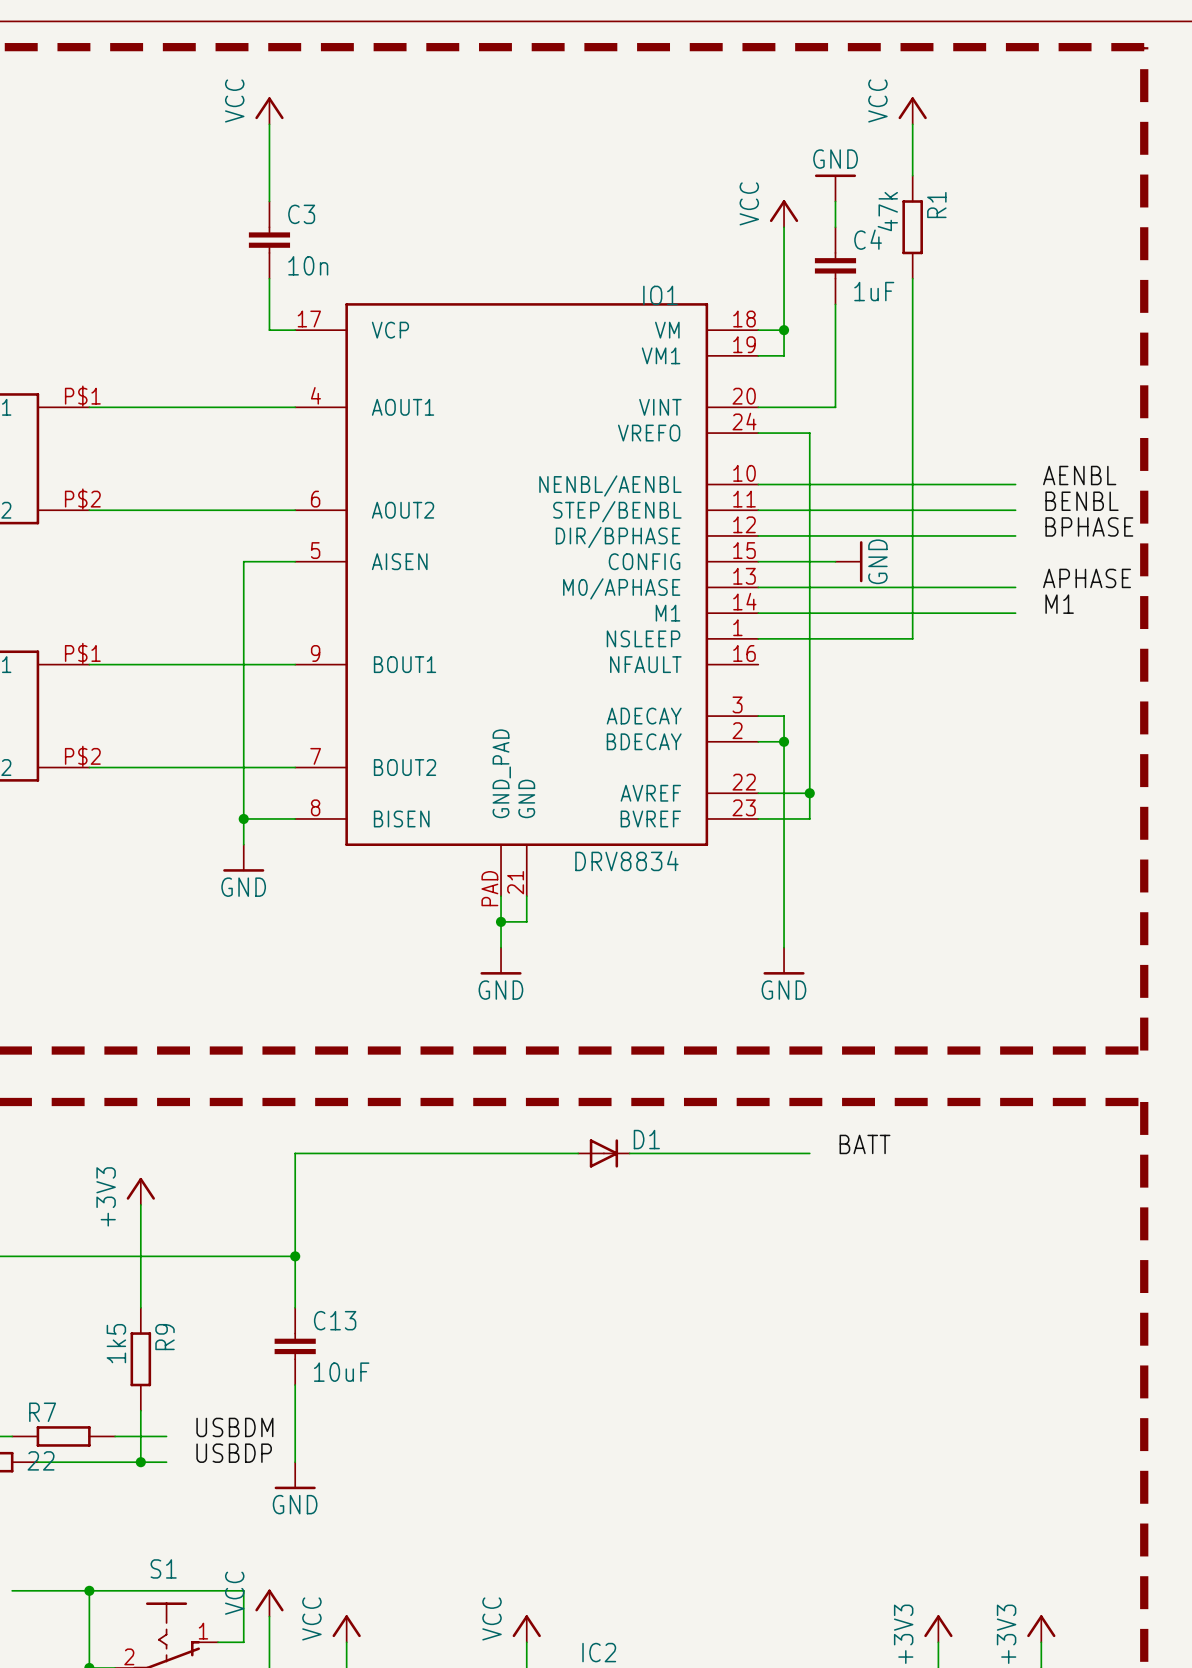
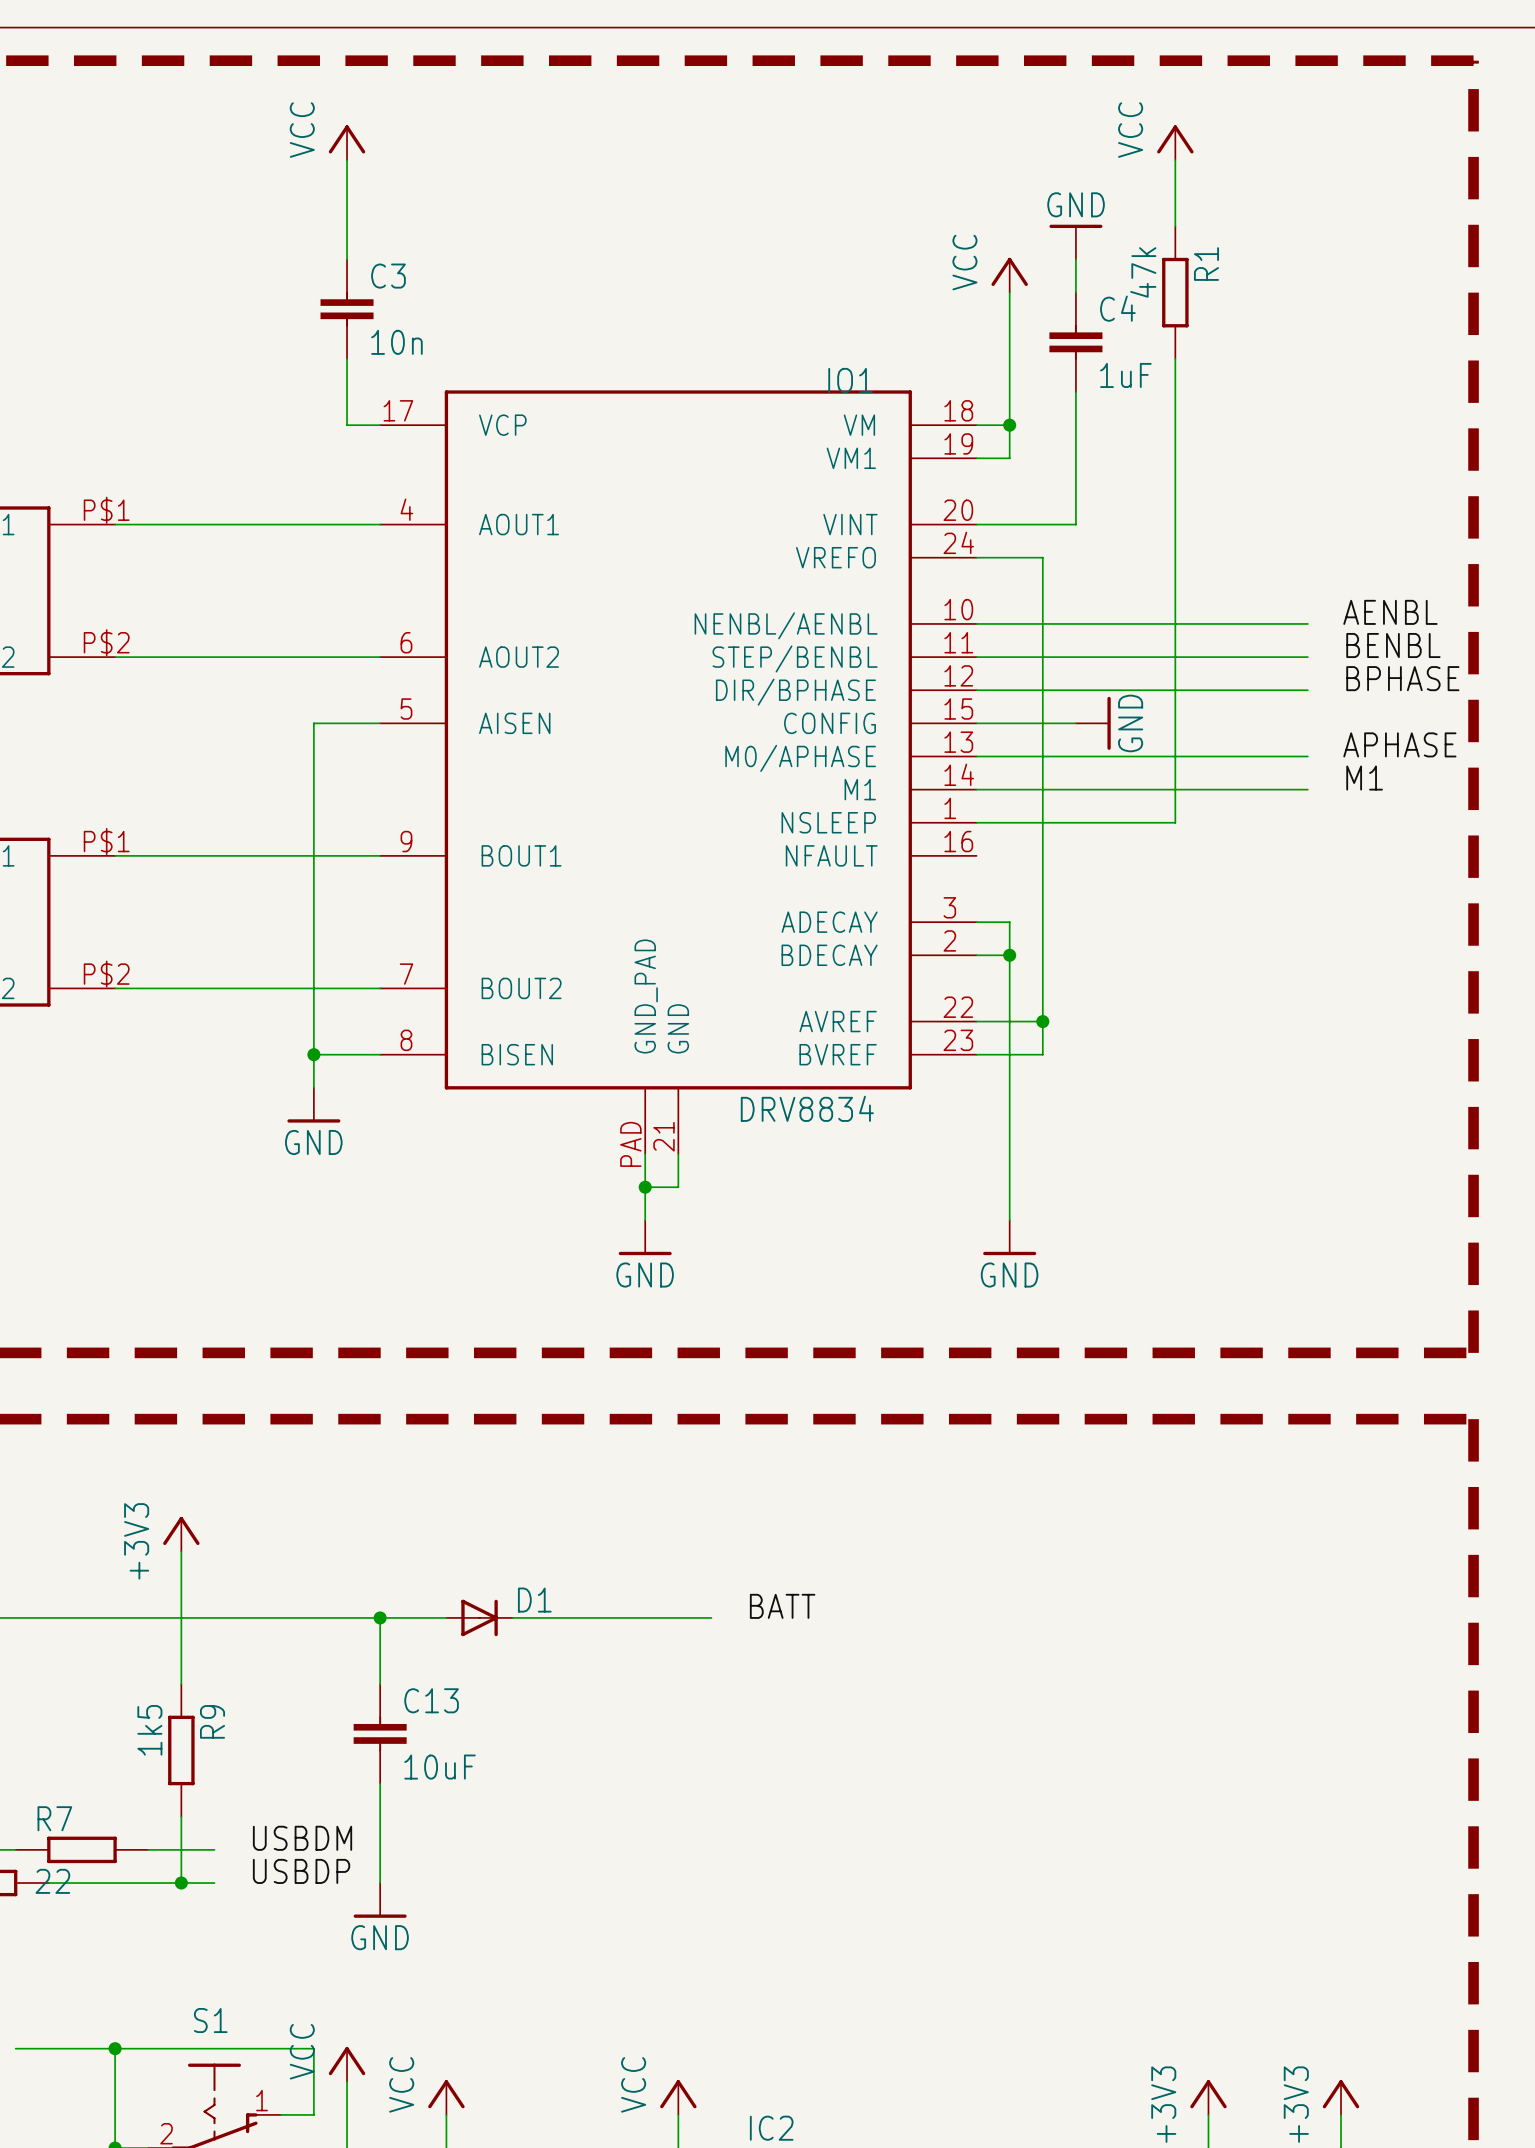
label: BATT (864, 1144) -> none
wire: (578, 1153) (295, 1153) (295, 1256) -> (446, 1617) (380, 1617)
D1 position: (603, 1153) -> (479, 1617)
wire: (629, 1153) (809, 1153) -> none
label: none -> BATT (782, 1606)
wire: none -> (512, 1617) (711, 1617)

